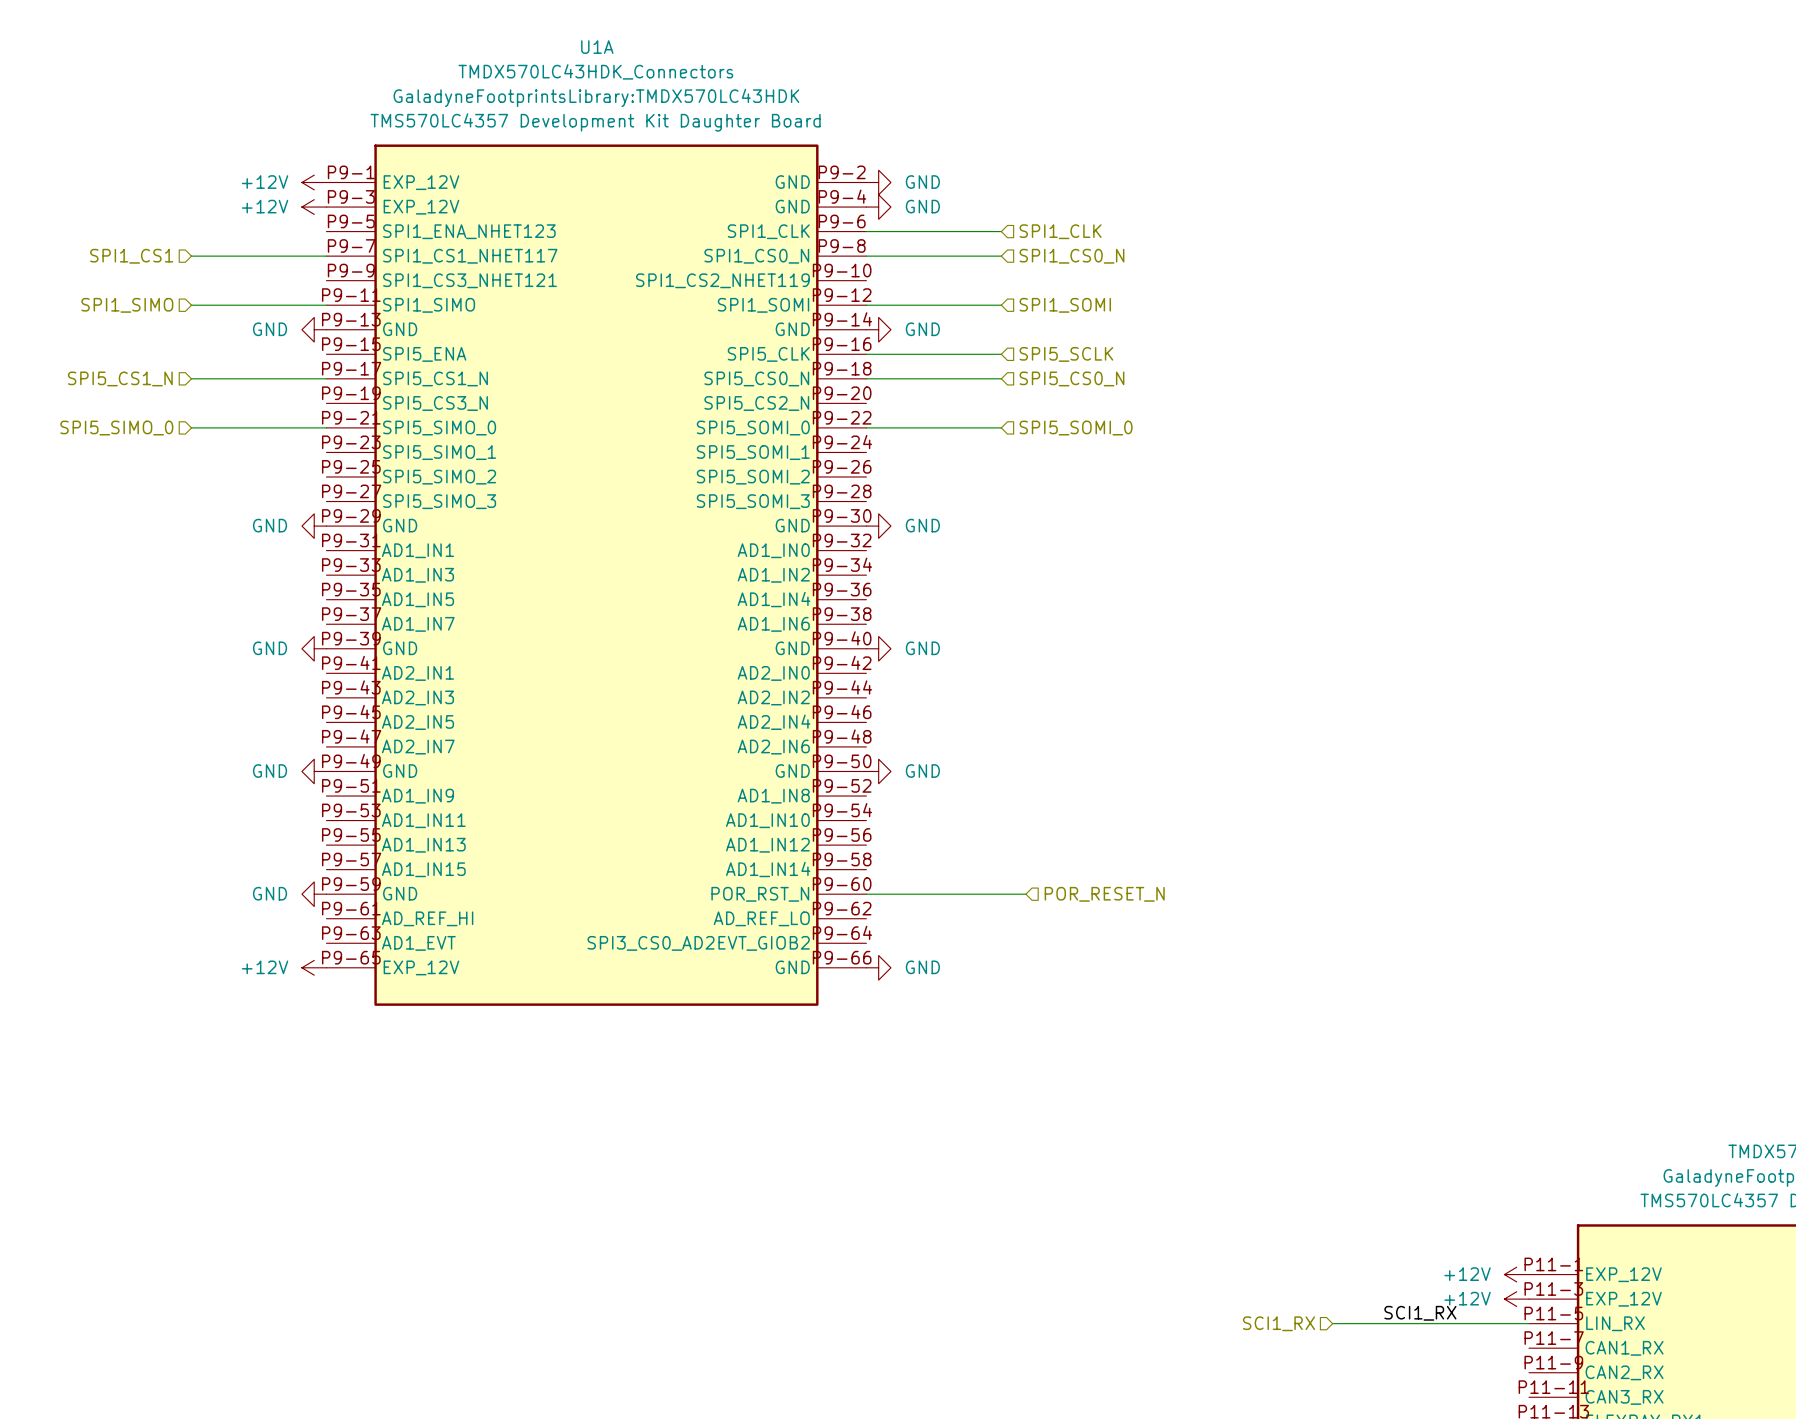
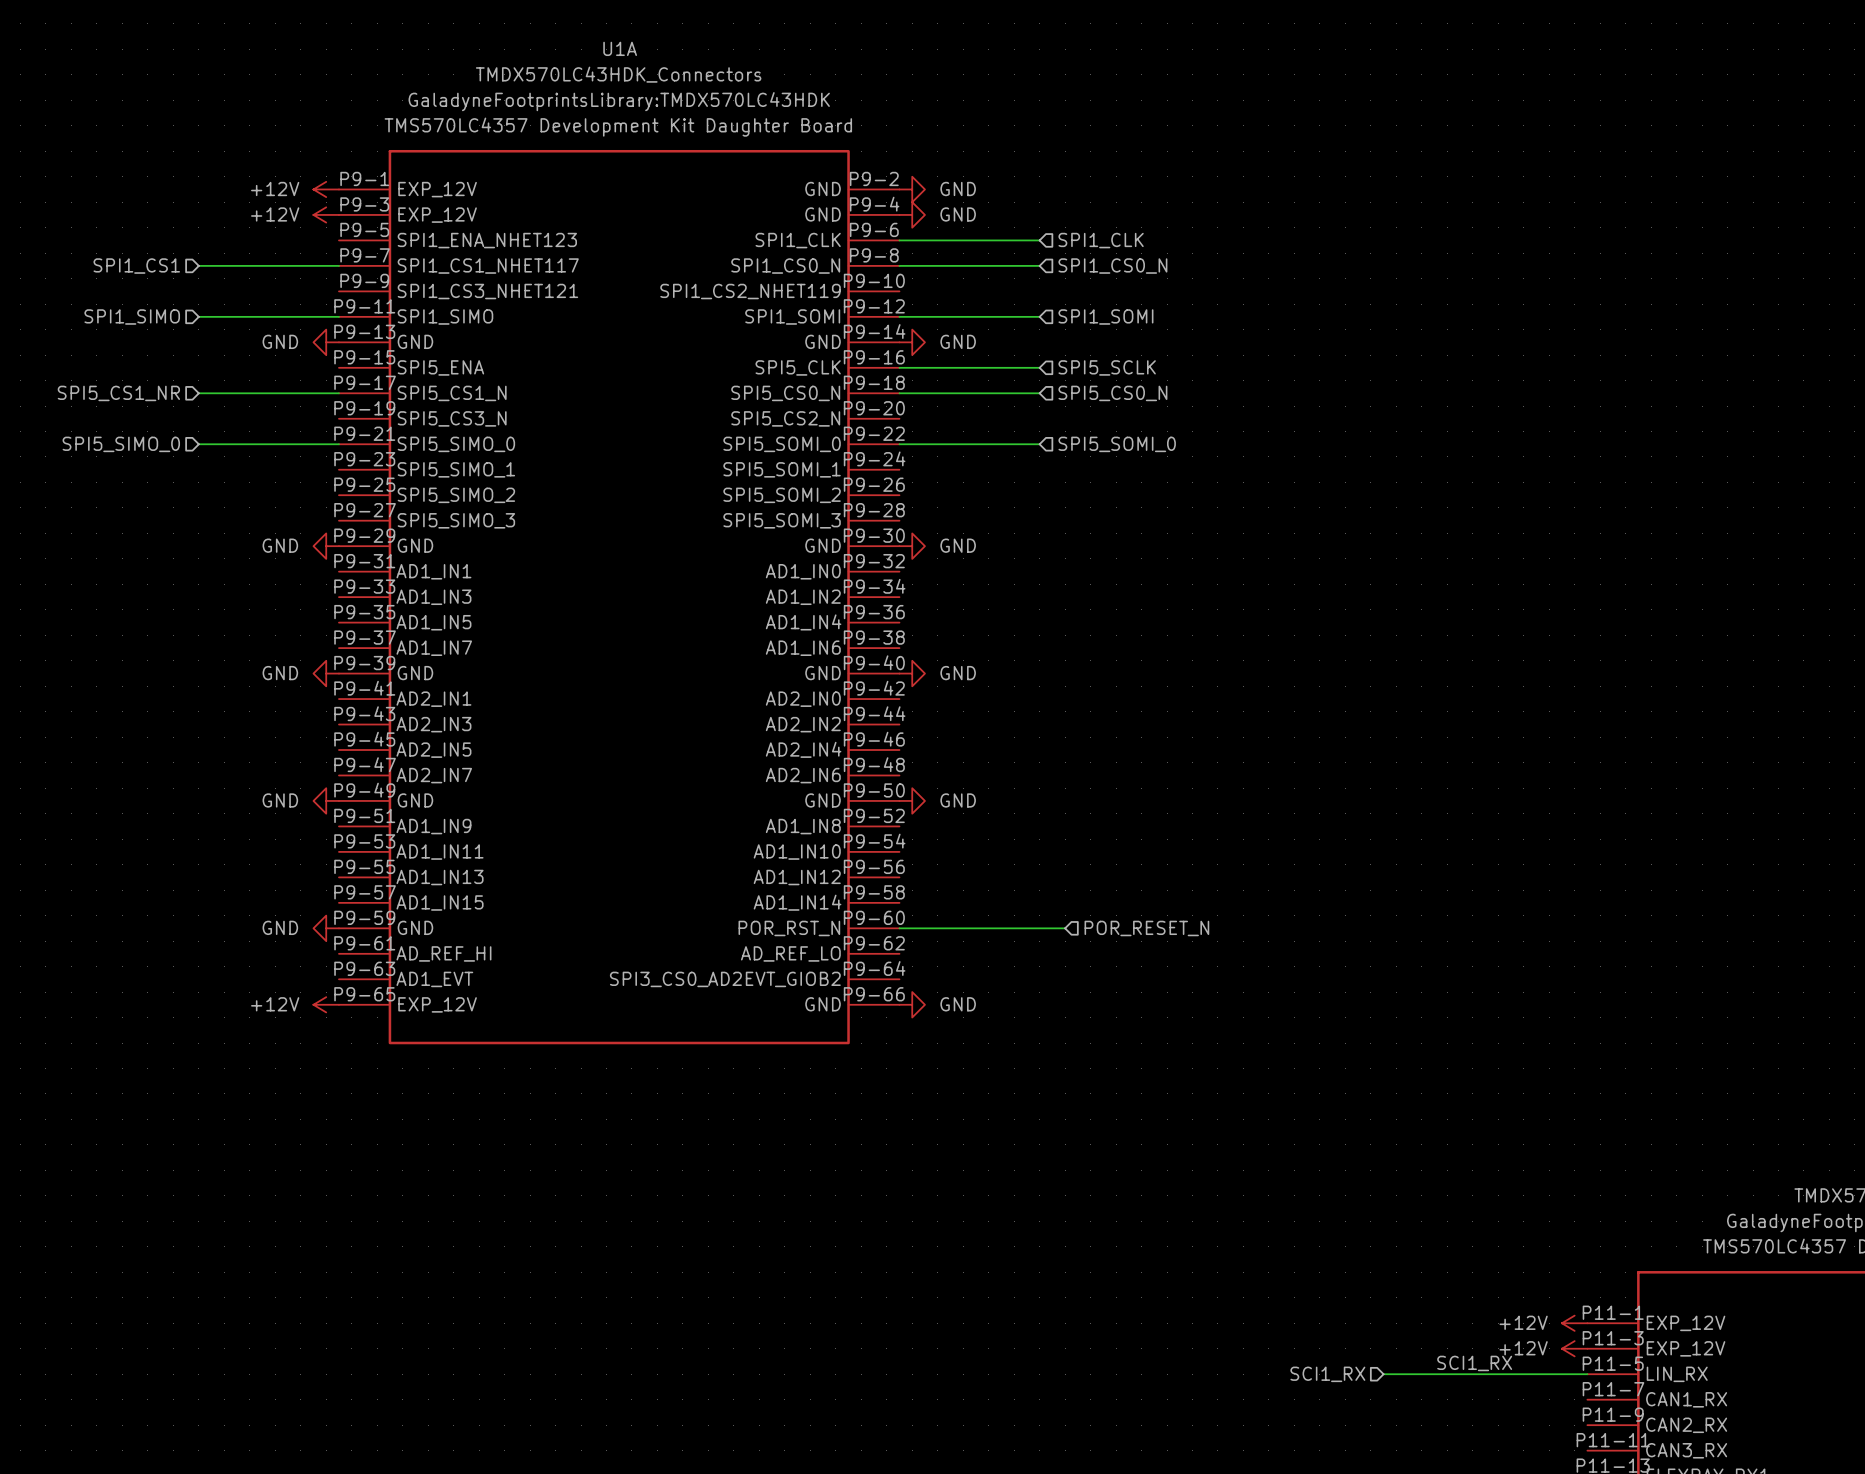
hierarchical label: SPI5_CS1_N (120, 378) -> SPI5_CS1_NR (118, 393)

